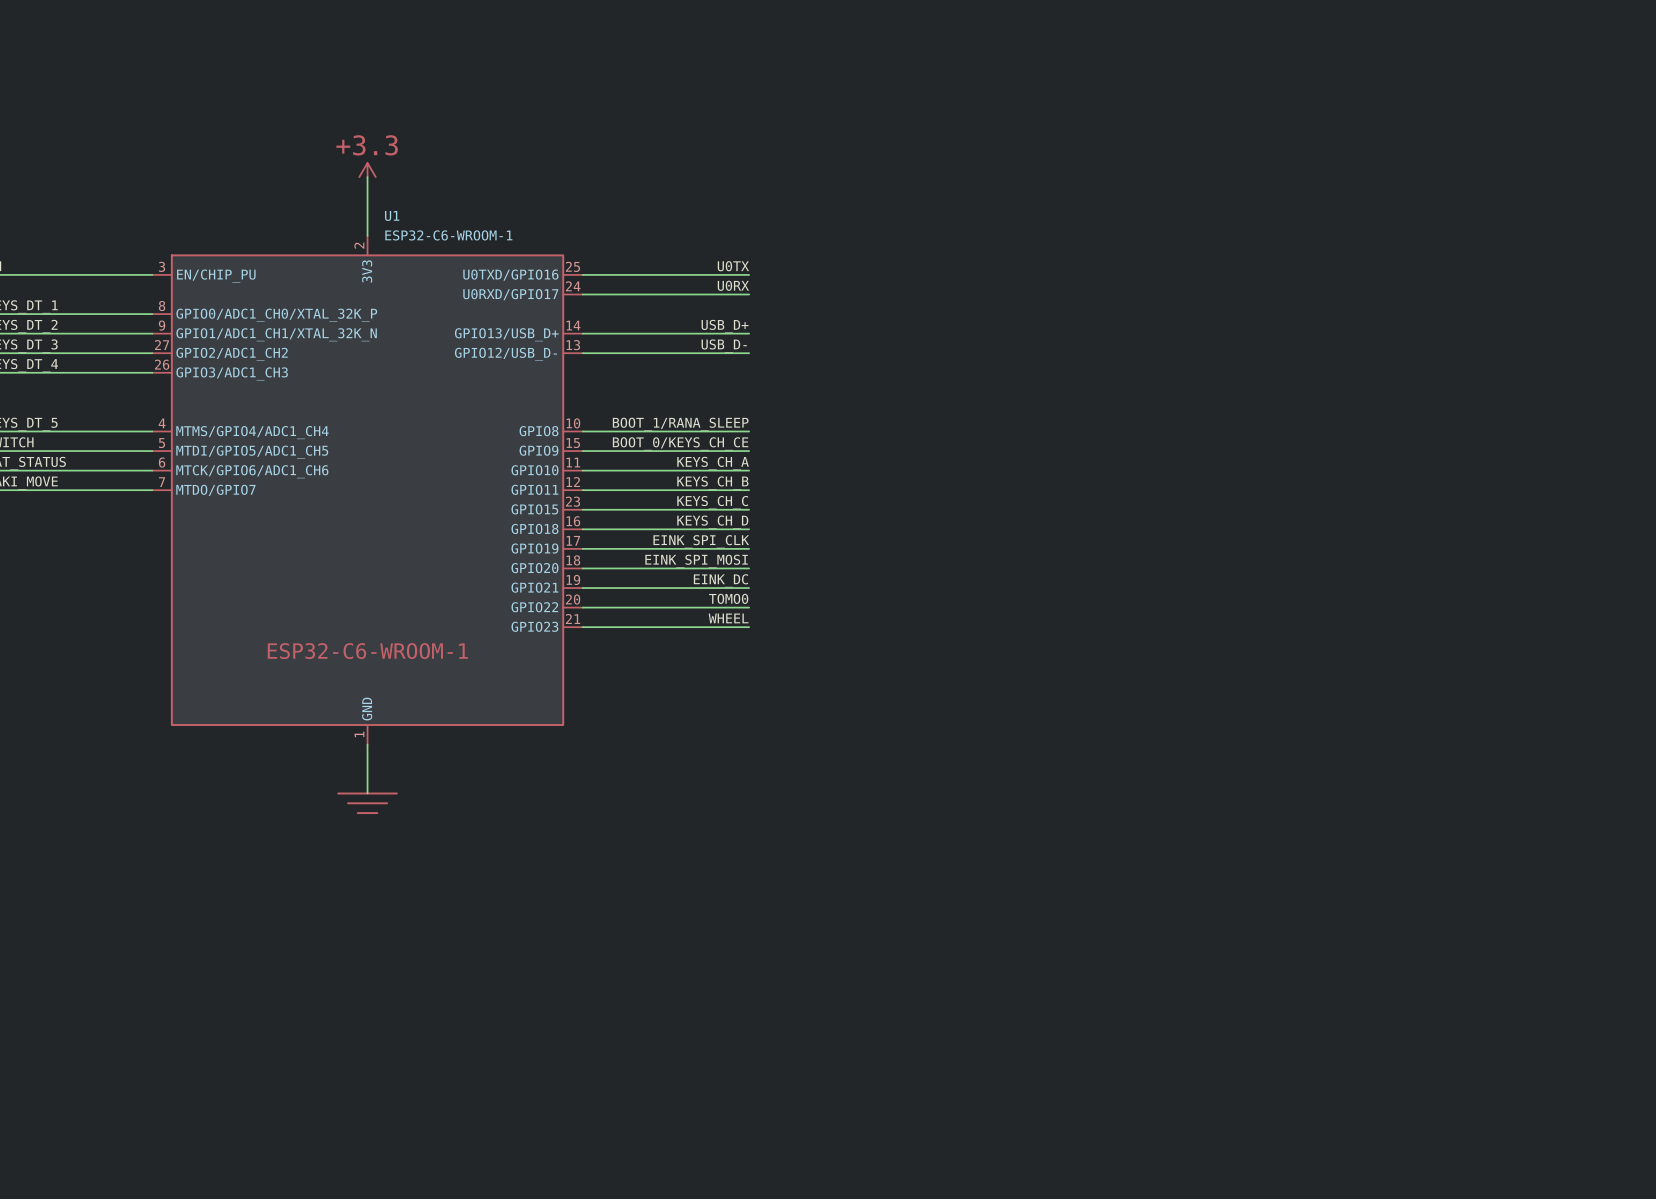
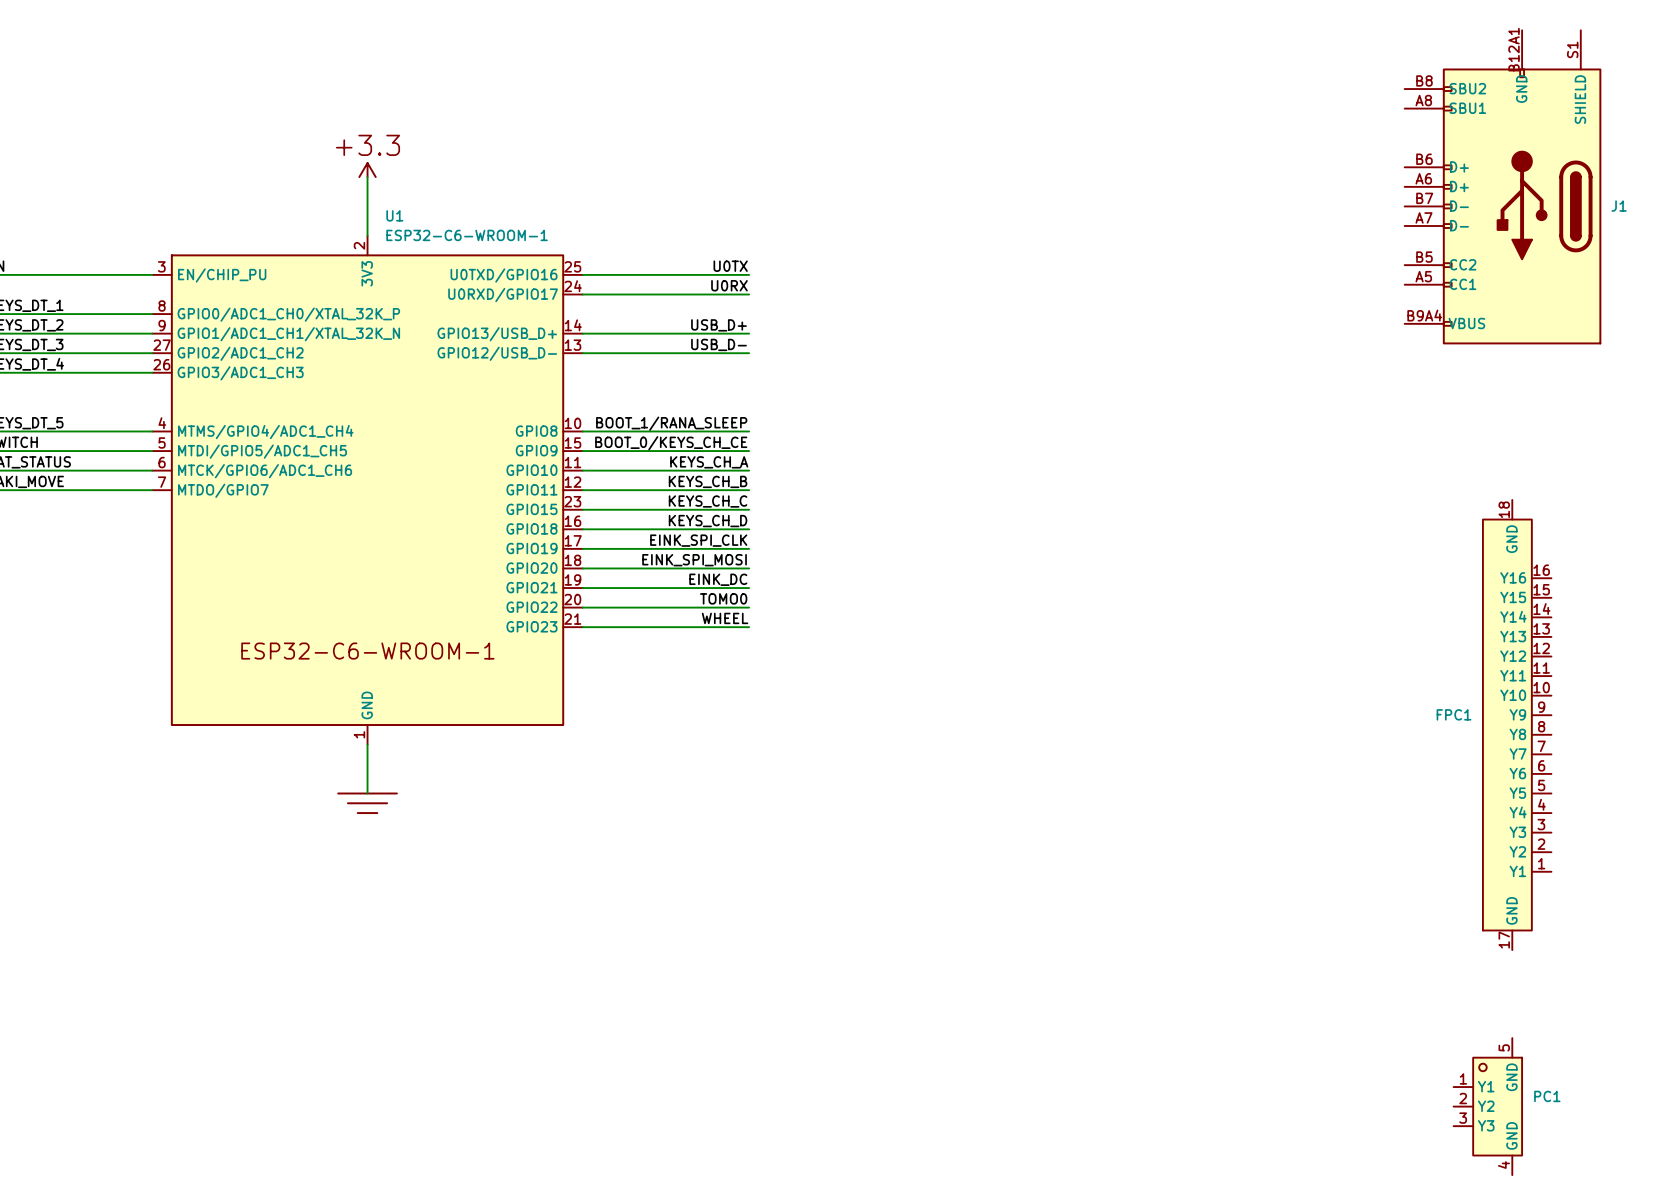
J1: none -> (1503, 187)
FPC1: none -> (1517, 725)
PC1: none -> (1487, 1106)

